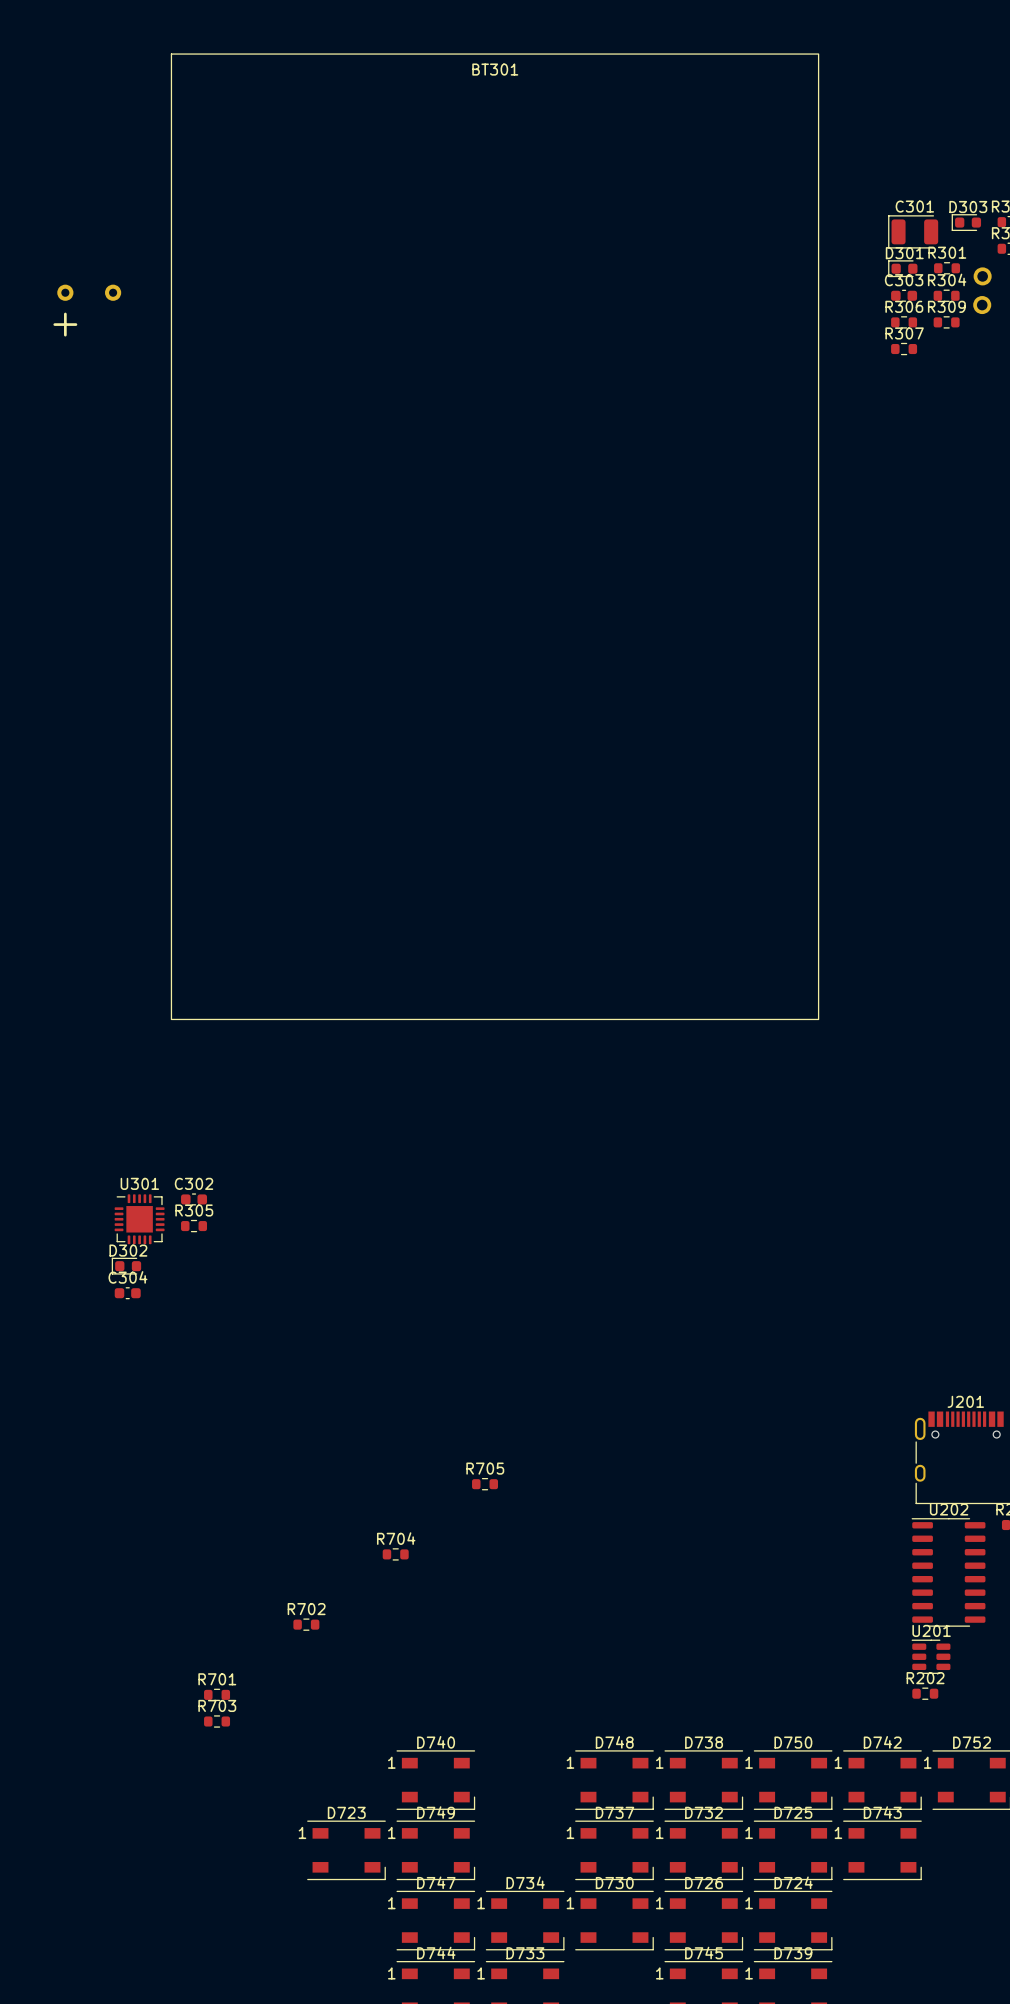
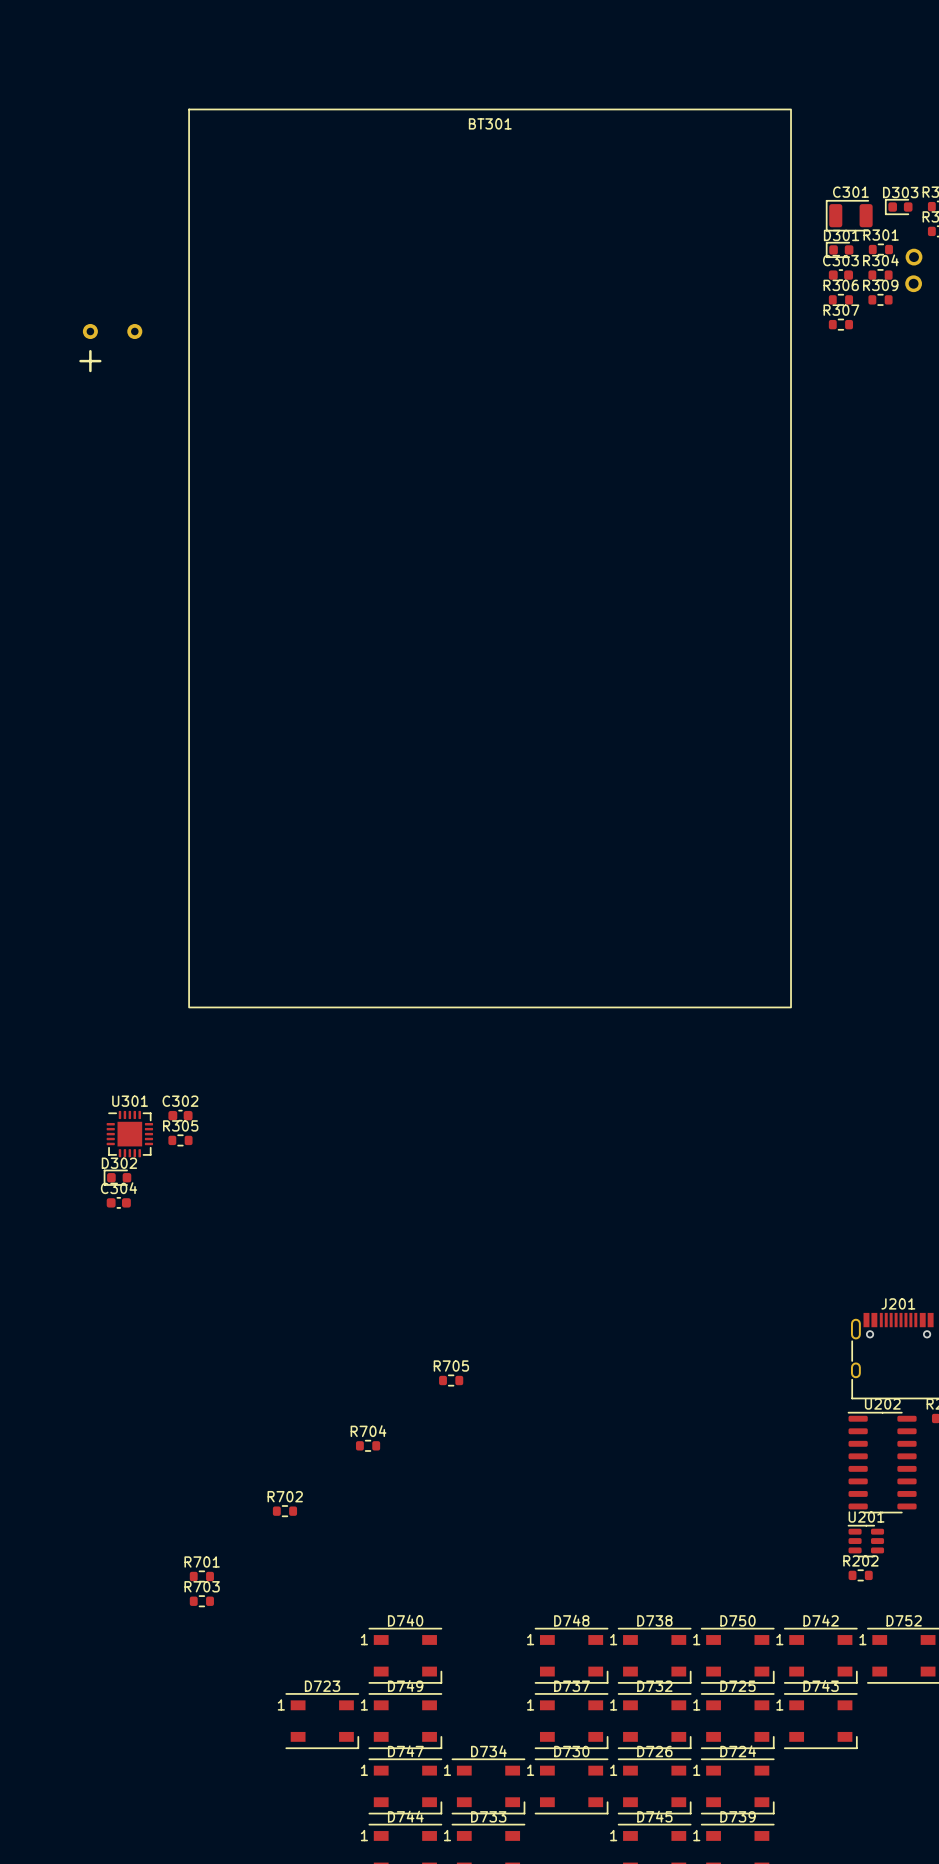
BT301 position: (436, 536) -> (435, 558)

